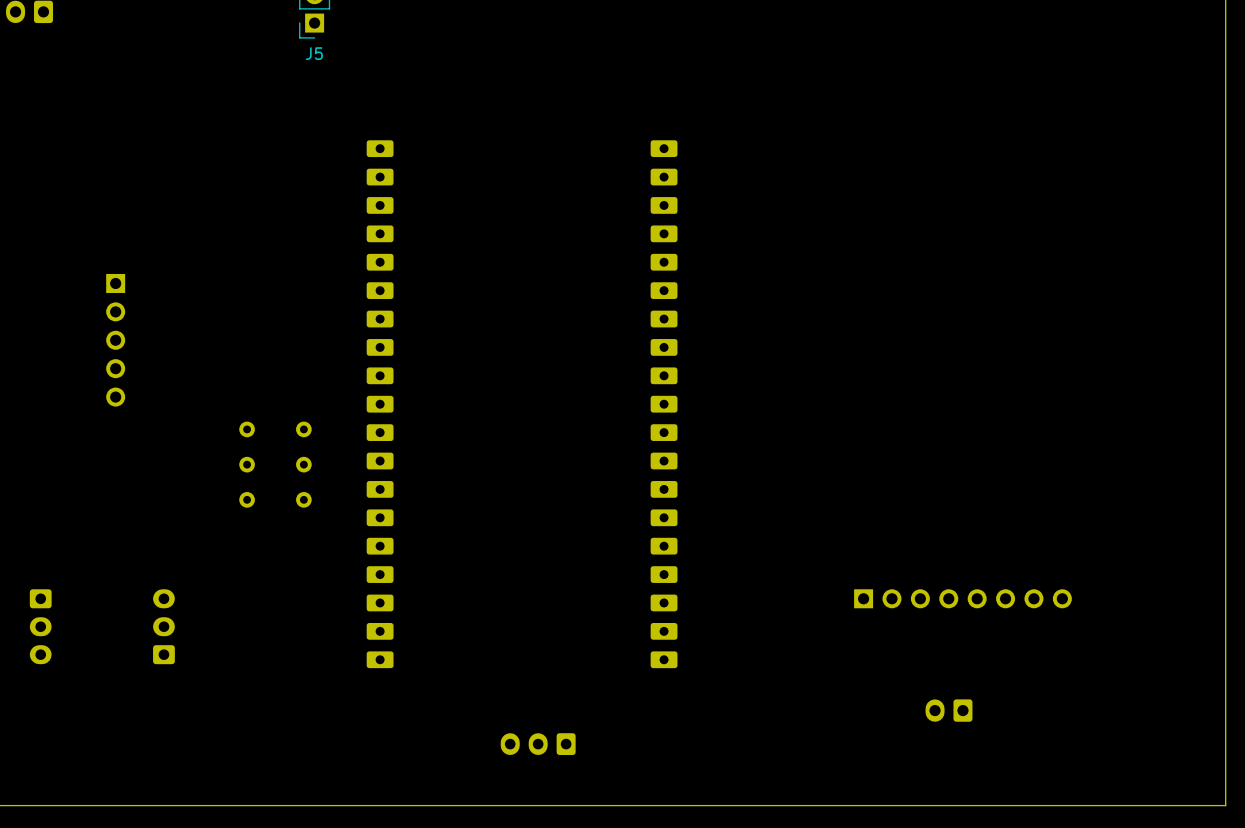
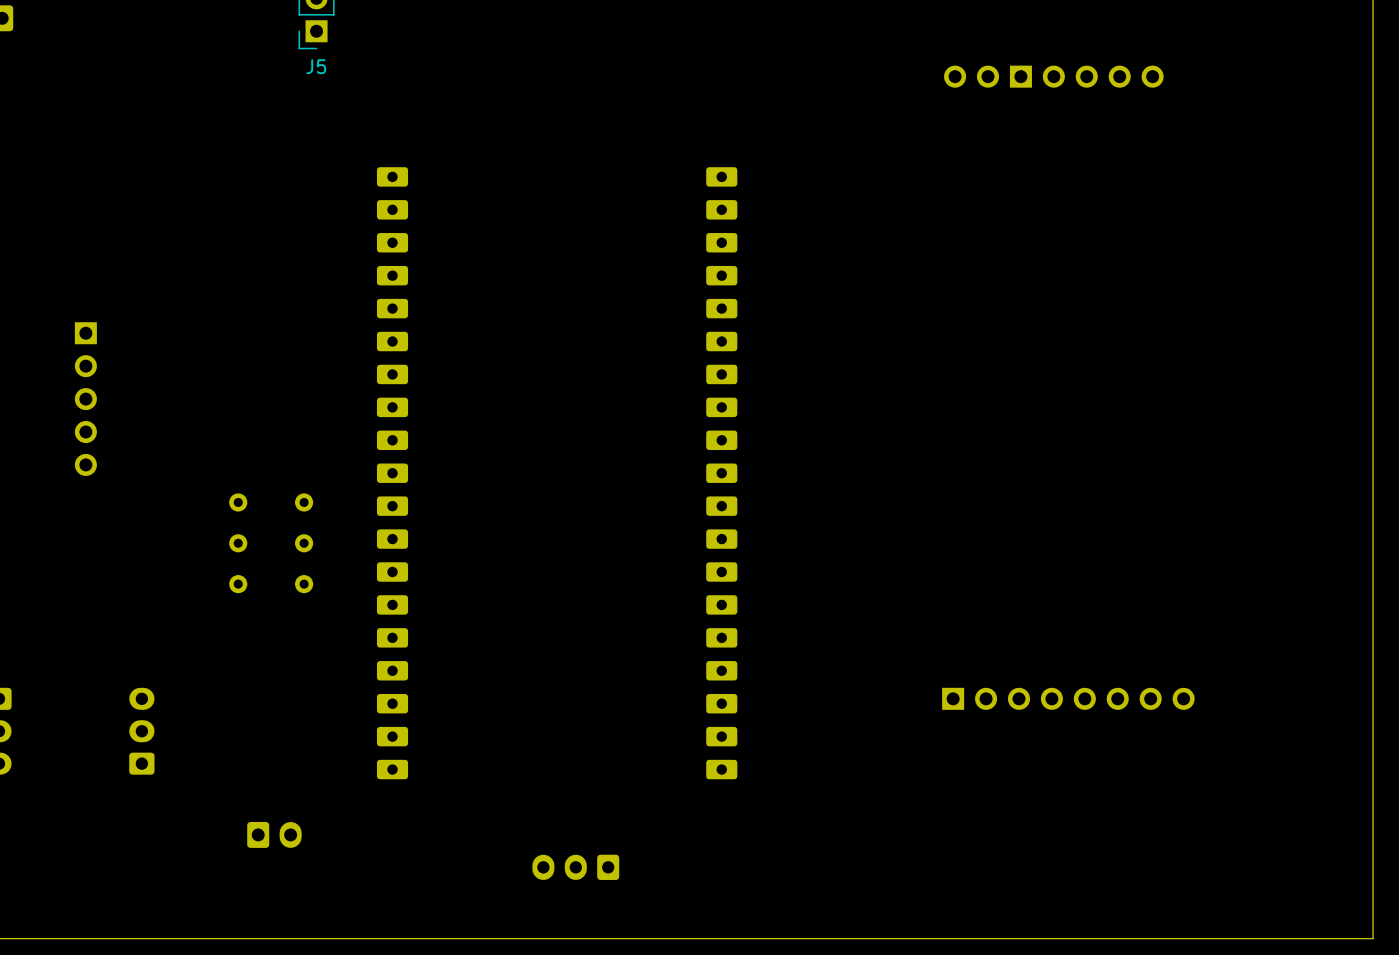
part: none -> (1053, 76)
part: (949, 710) -> none
part: none -> (274, 834)

